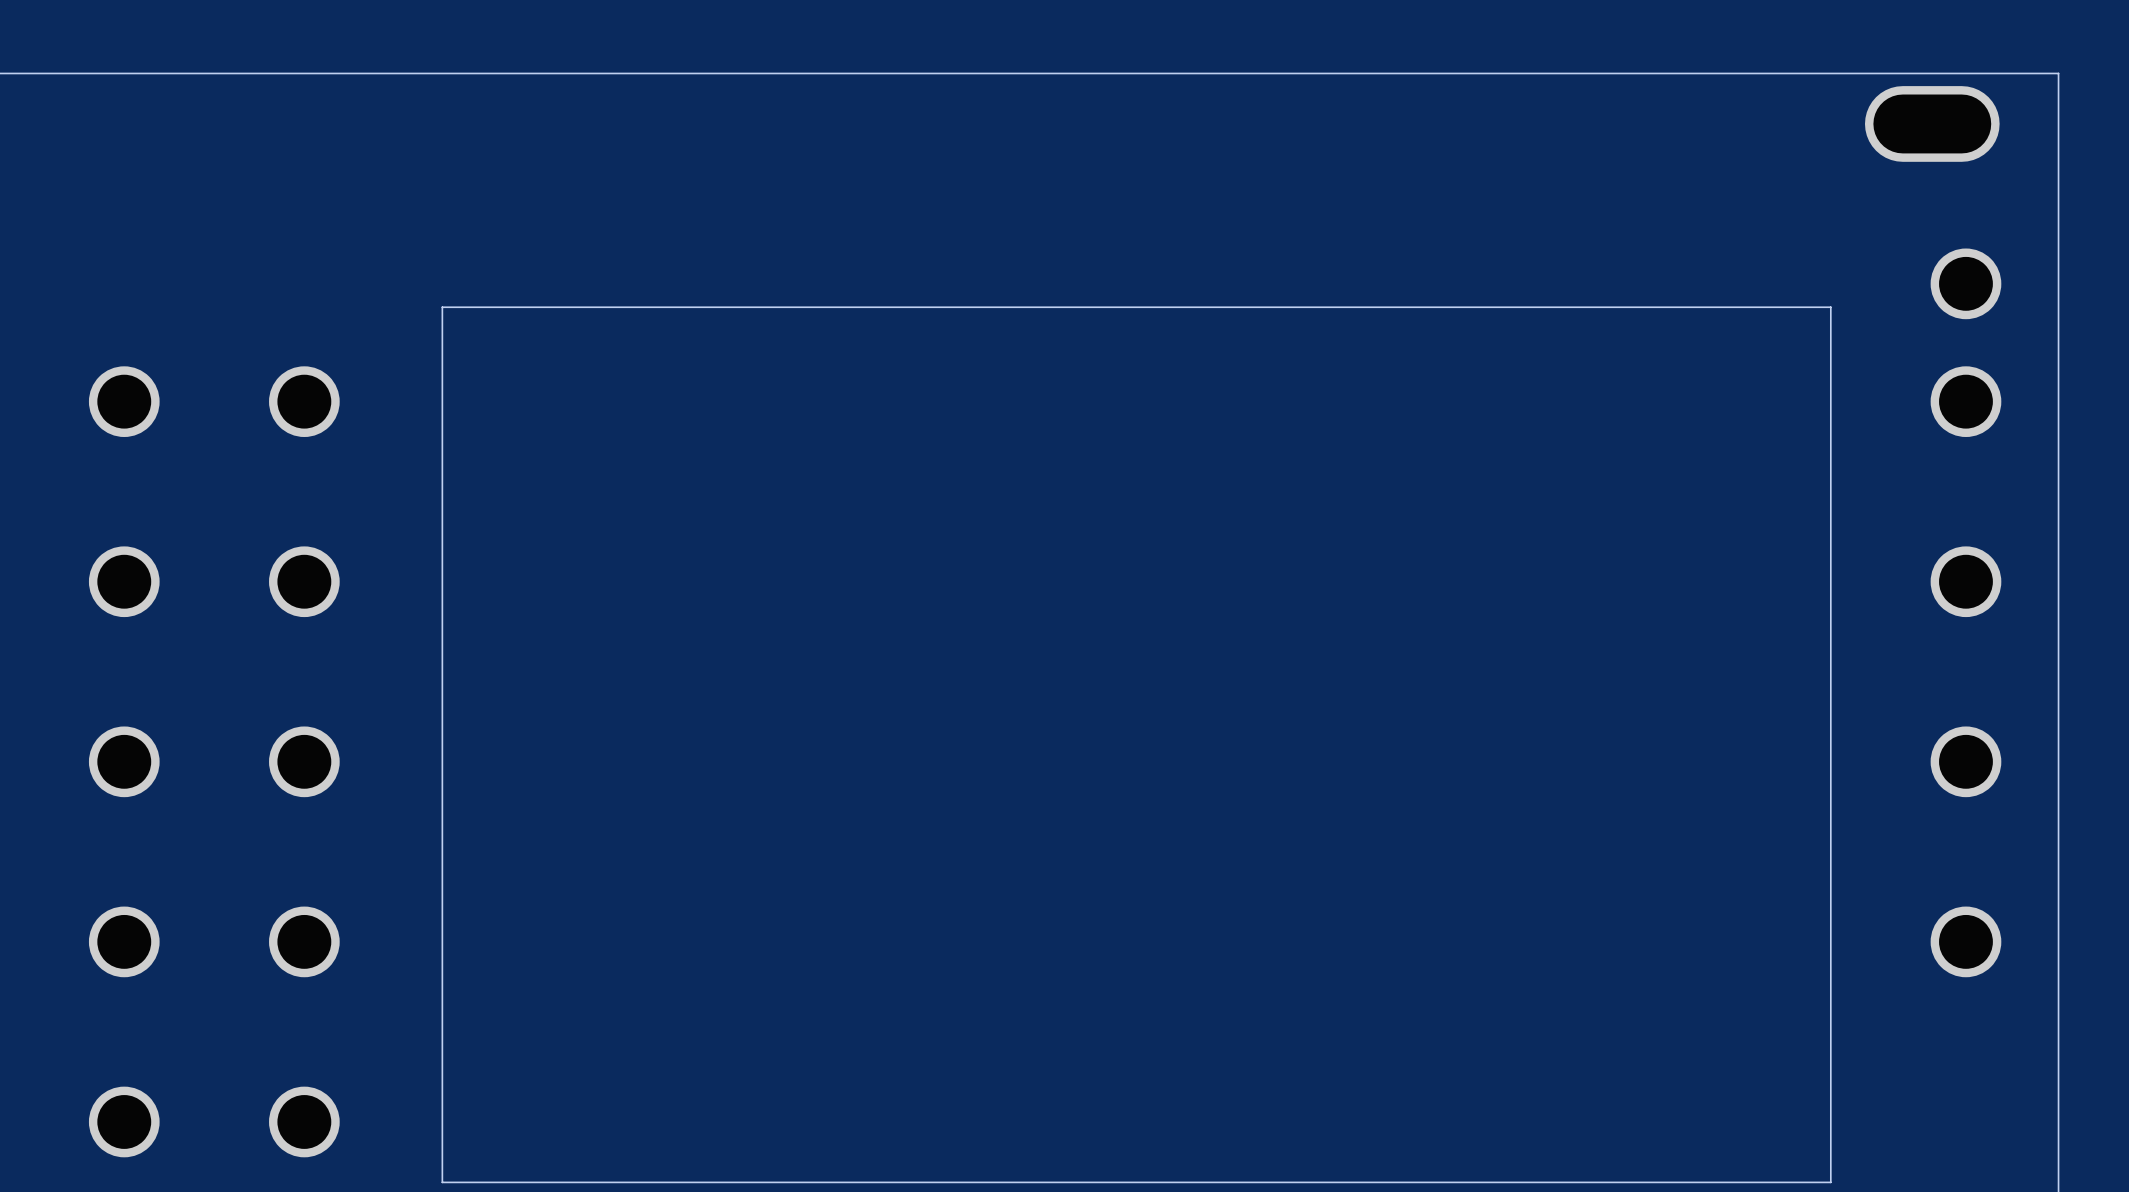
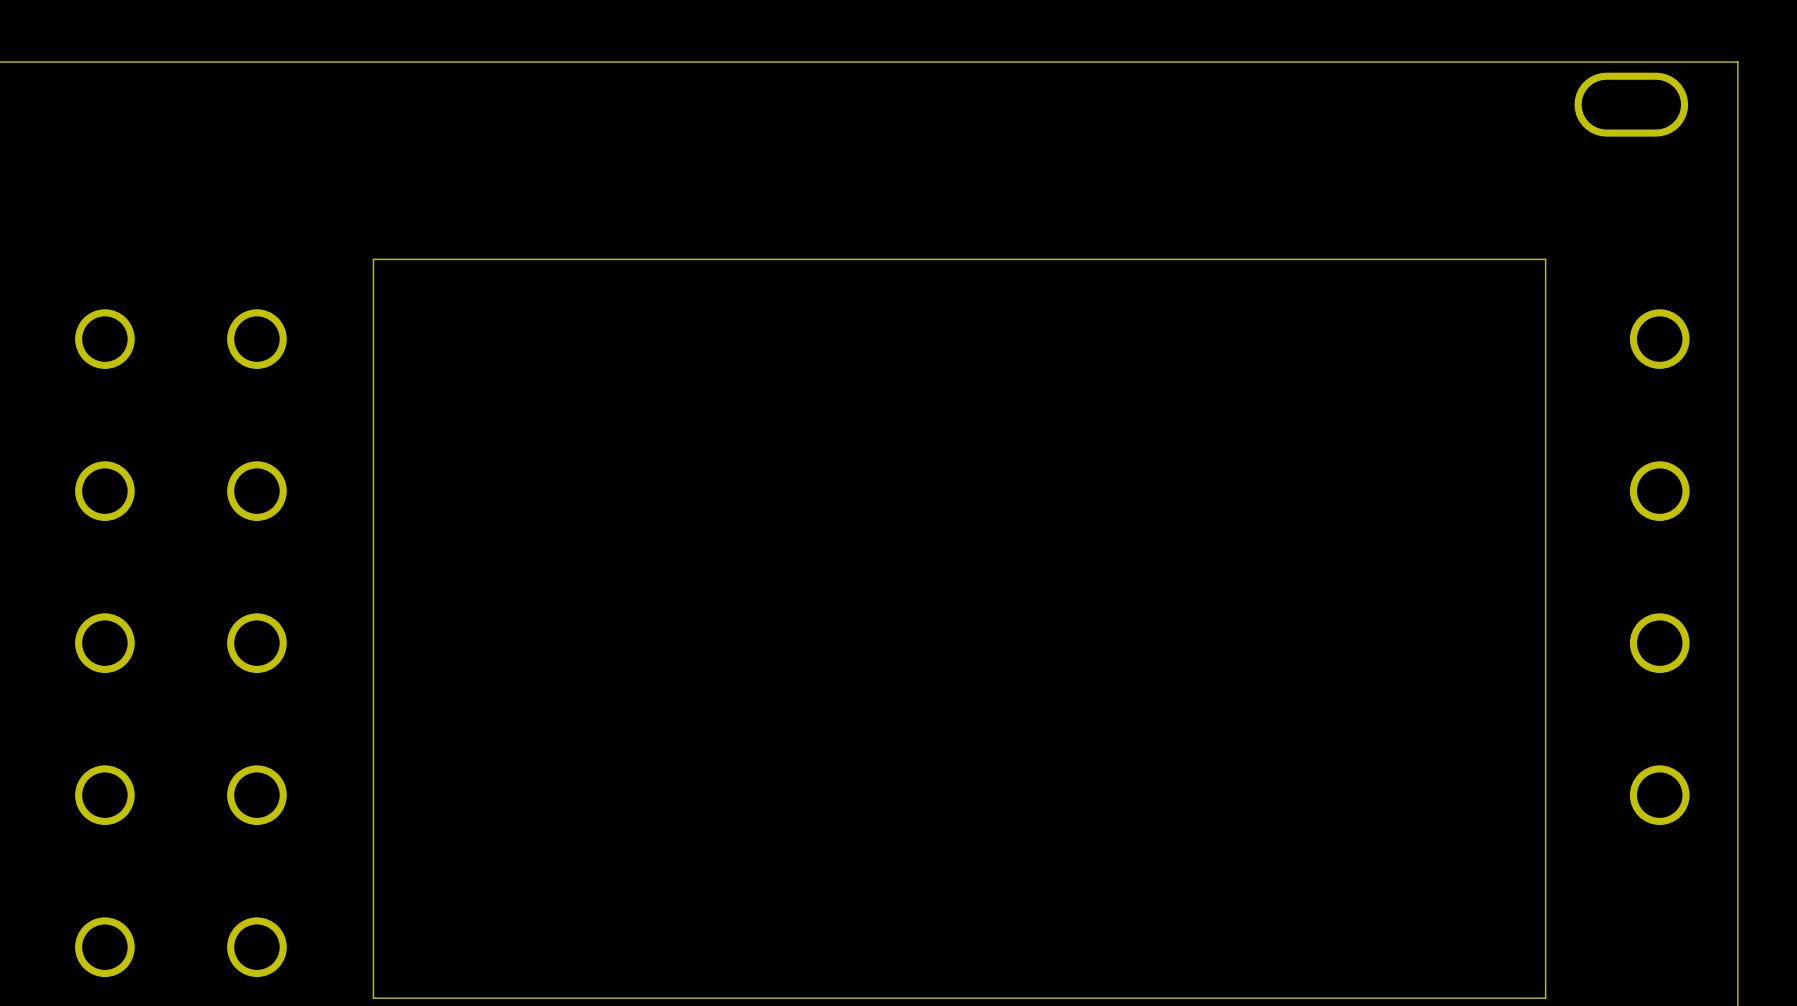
part: (1965, 283) -> none

